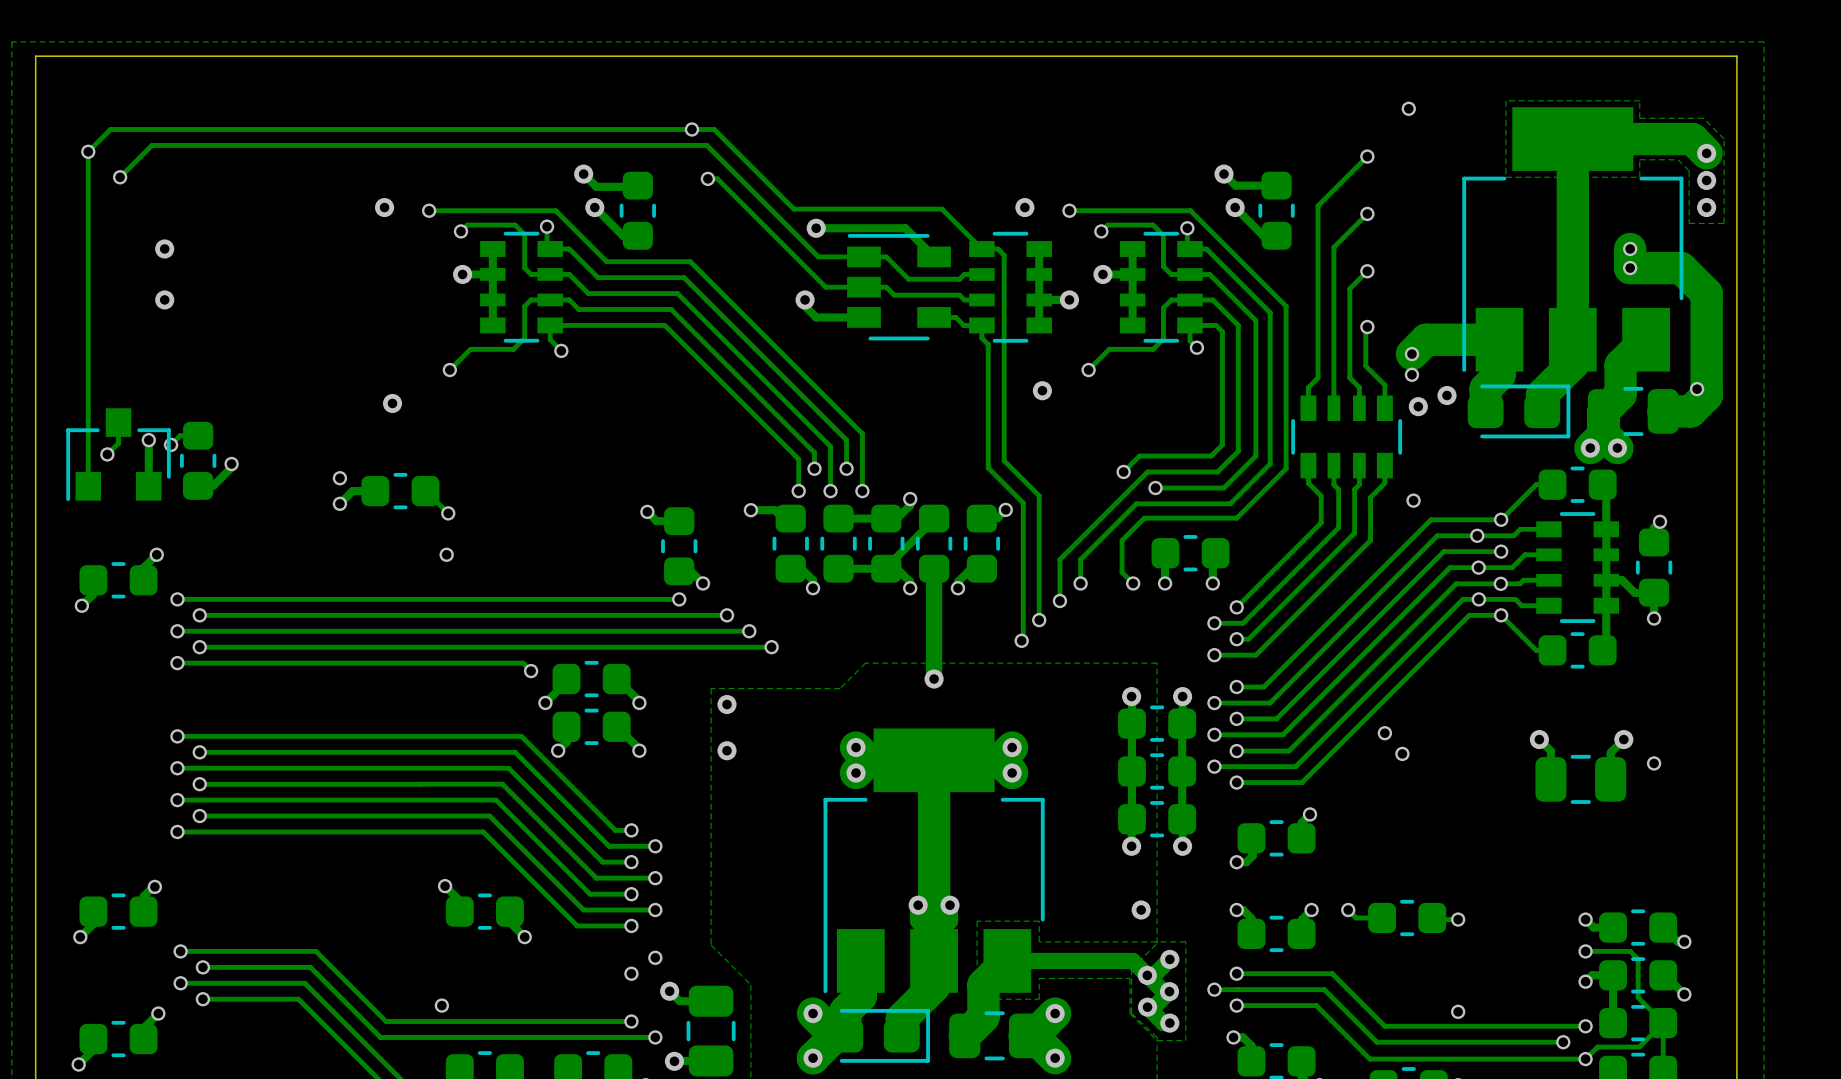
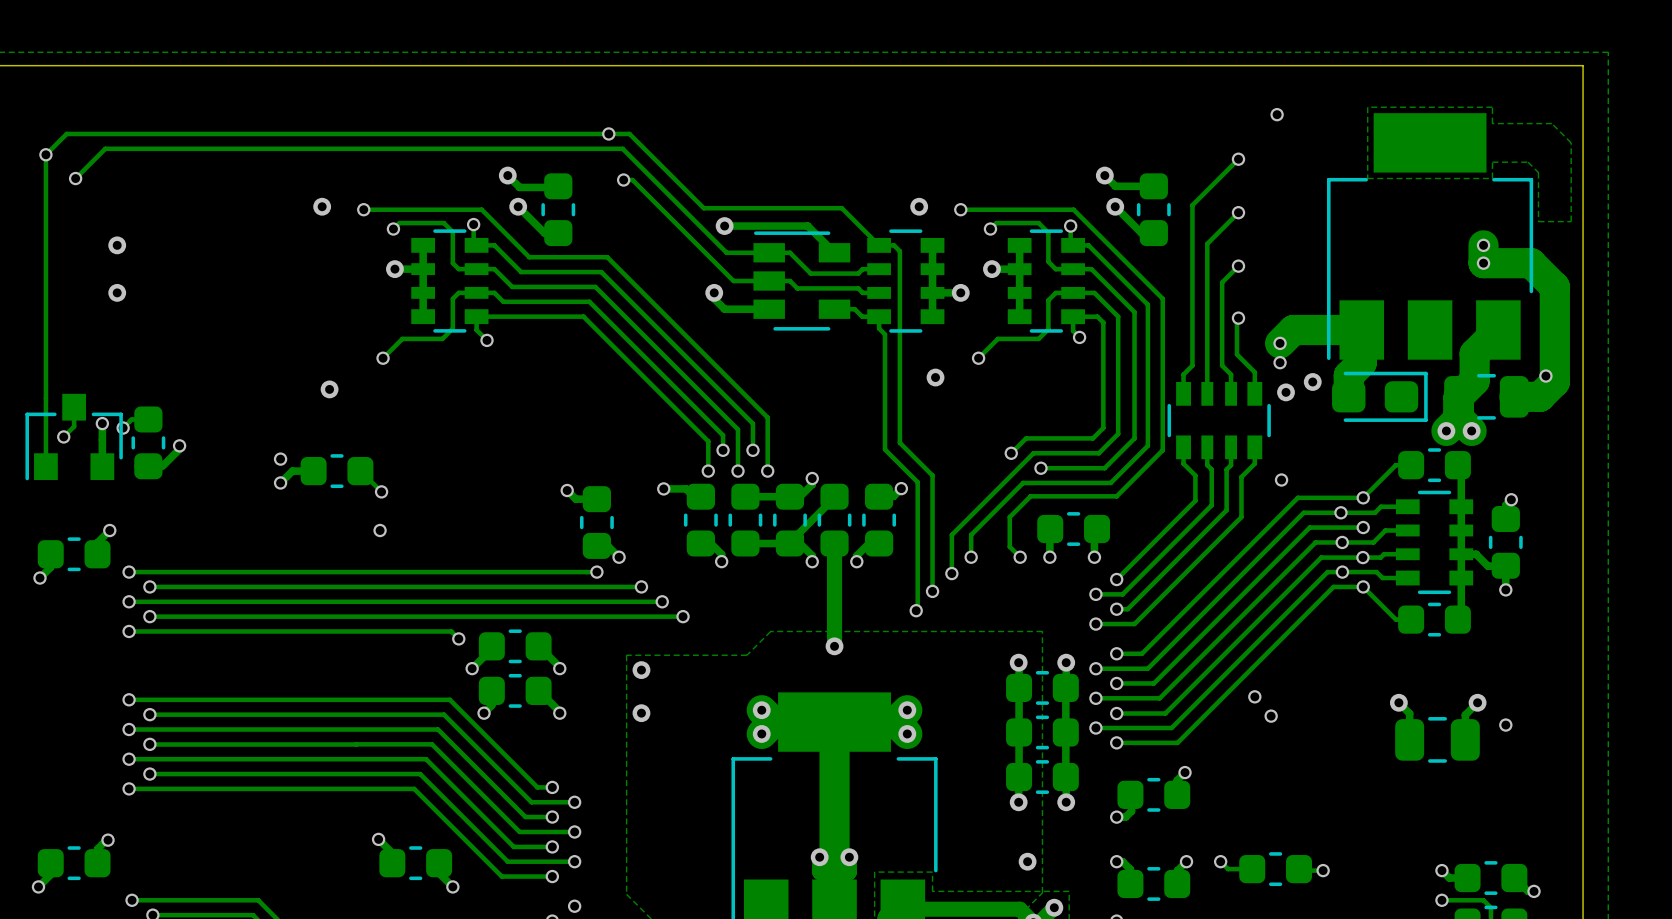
track: (1706, 153) (1692, 139) (1572, 139) (1572, 364) (1542, 394) (1542, 411) -> none
via: (1706, 153) -> none
via: (1706, 180) -> none
via: (1706, 207) -> none

